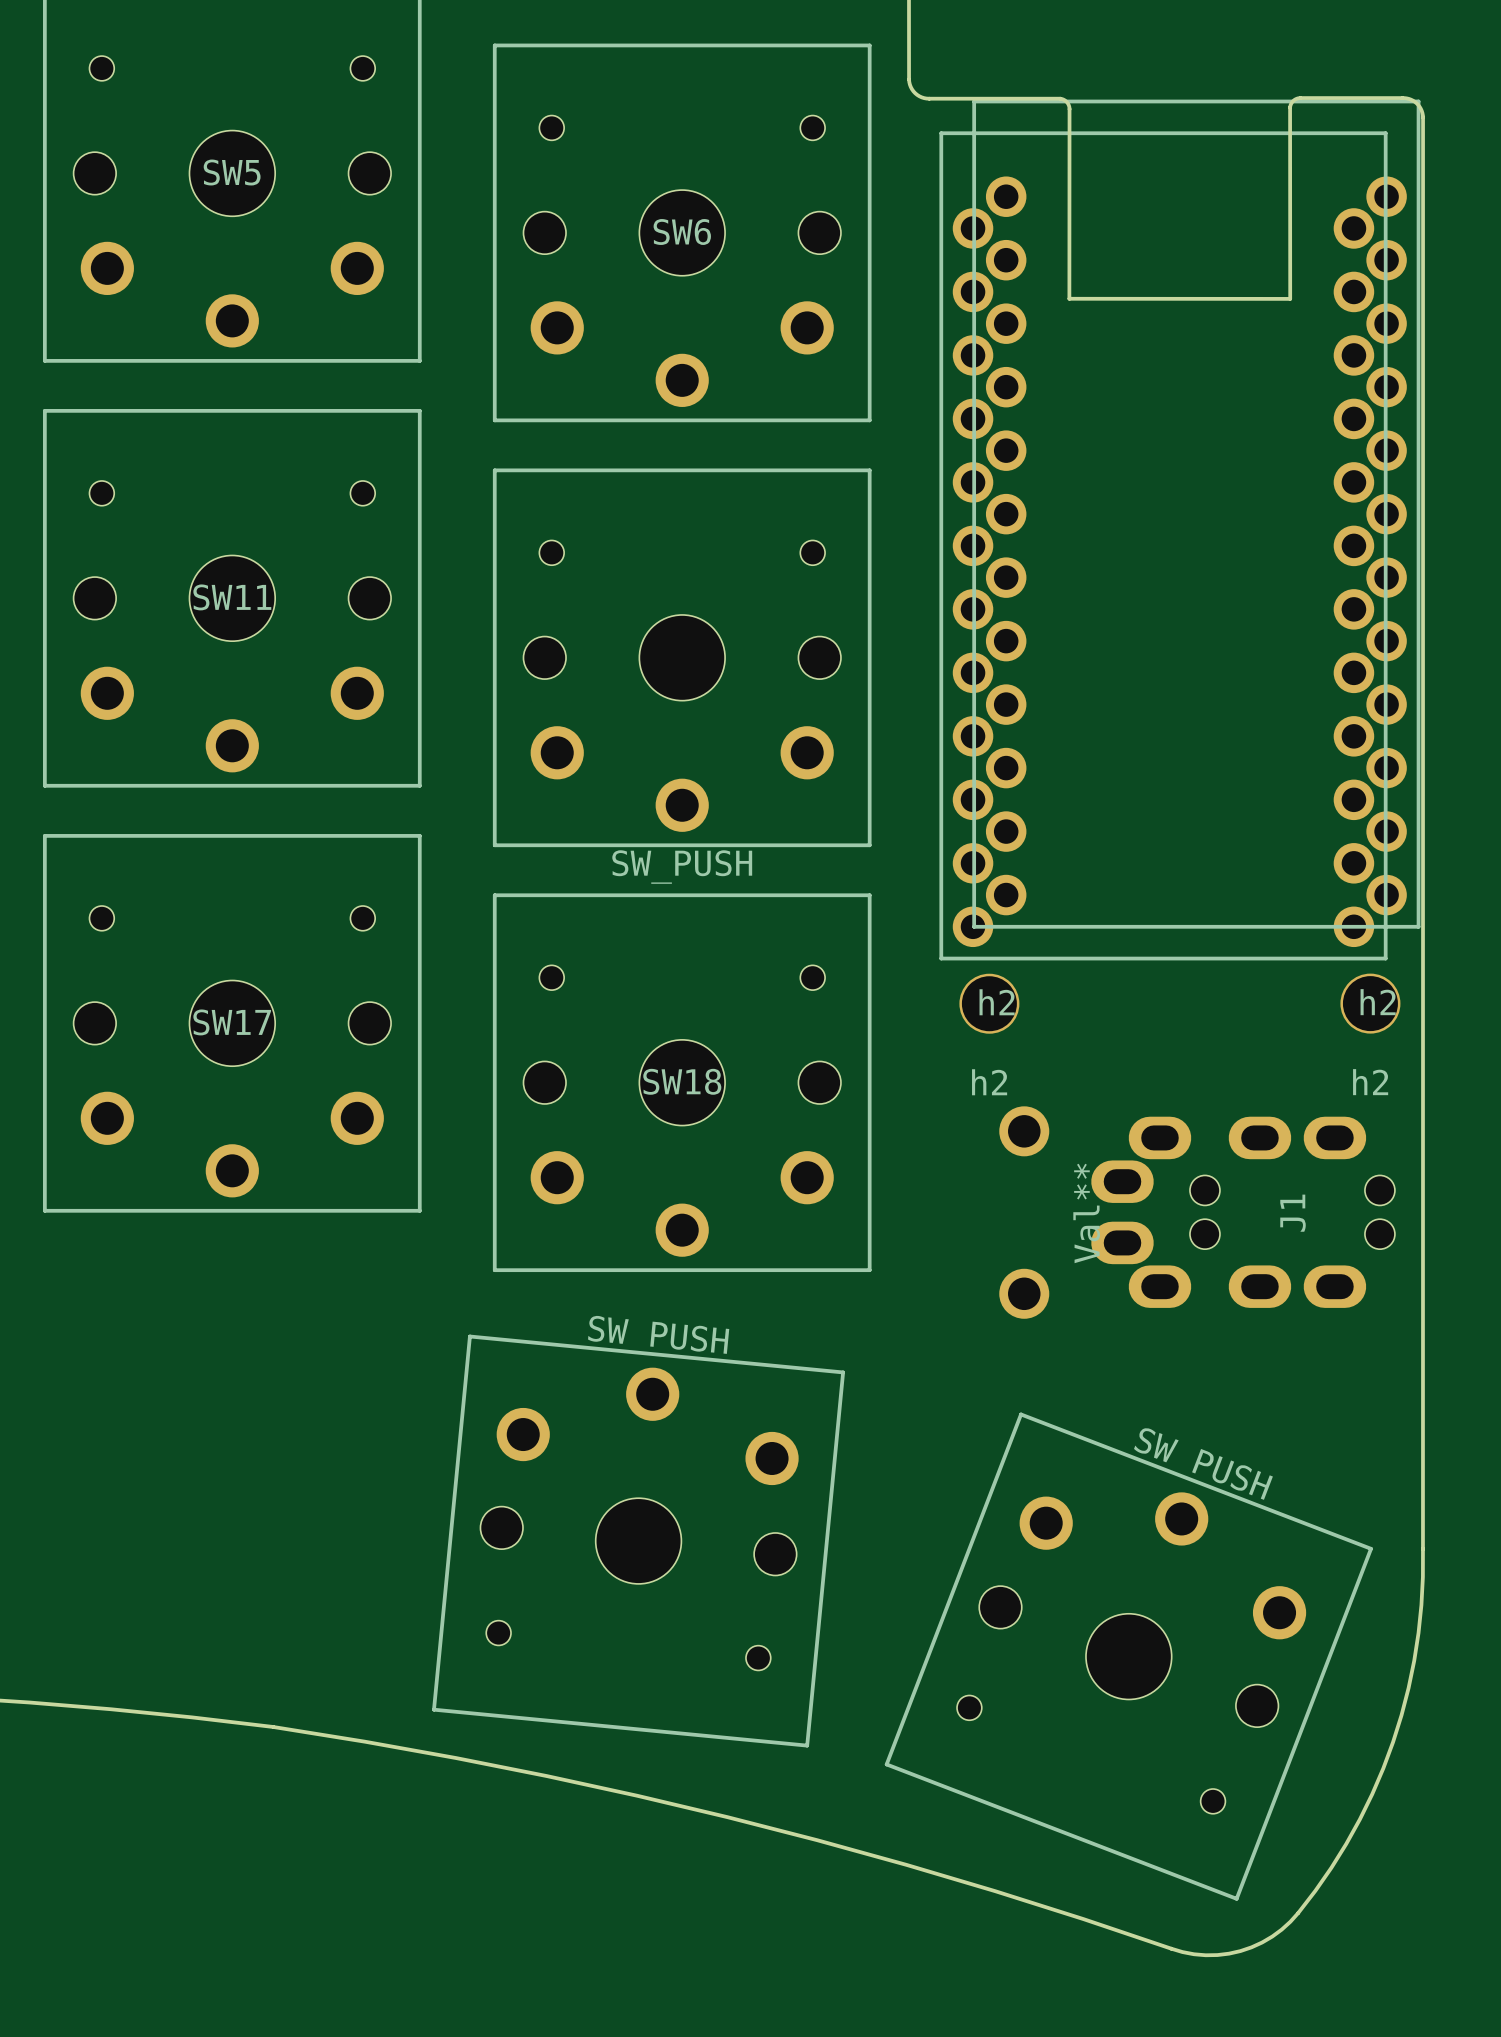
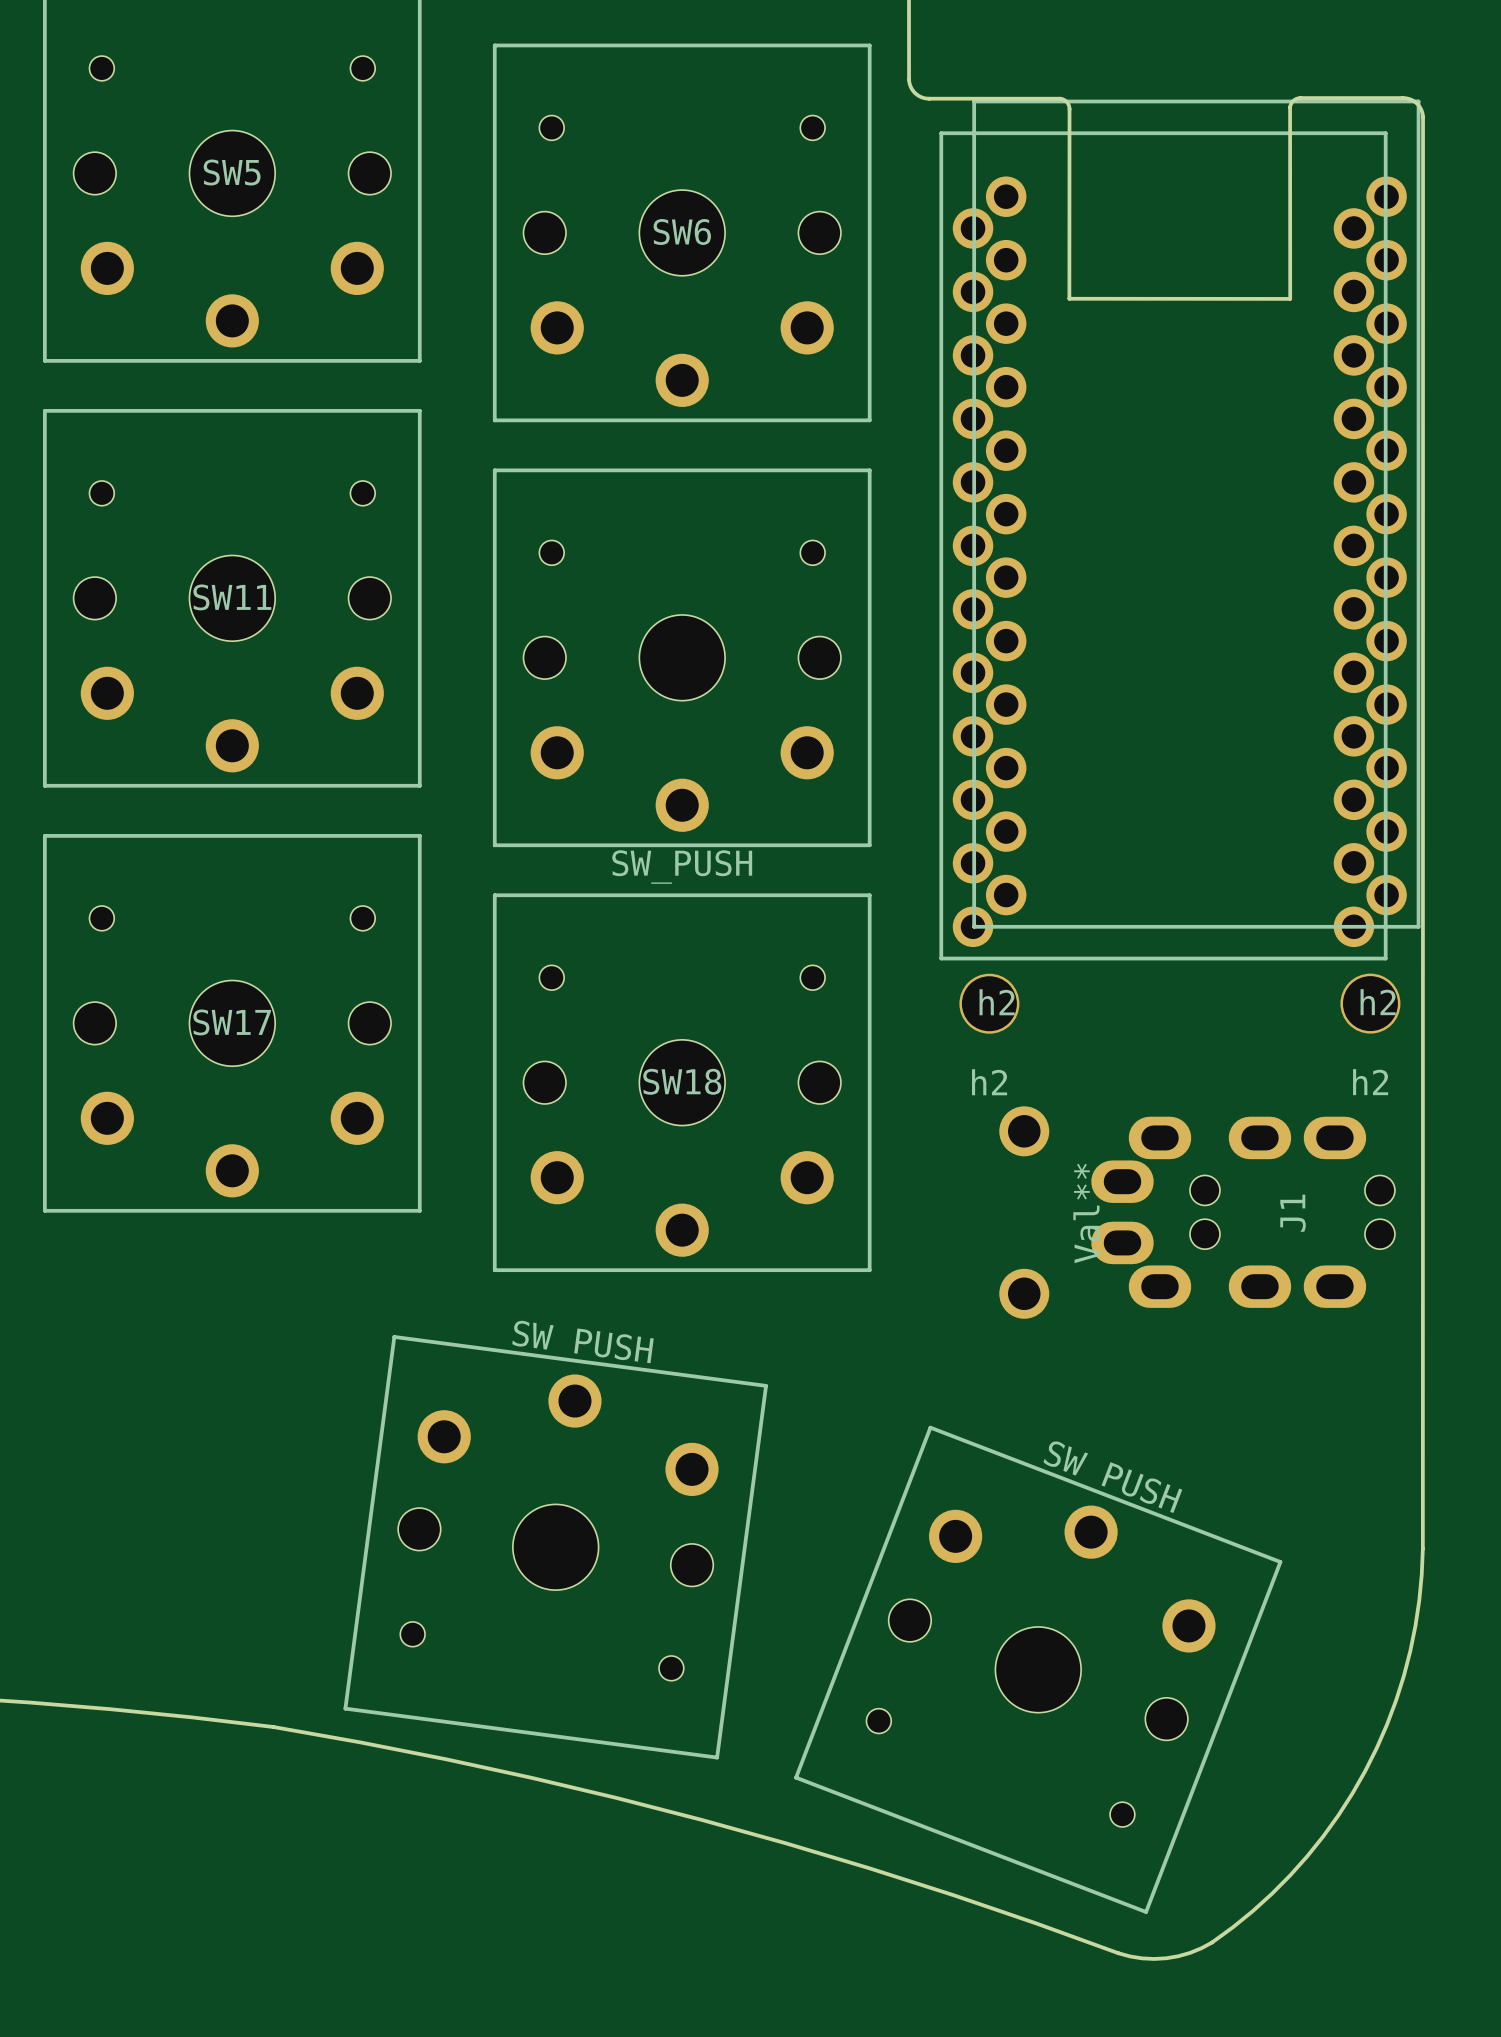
board edge: (1423, 117) (1421, 1605) (1408, 1688) (1383, 1768) (1346, 1843) (1315, 1890) (1290, 1921) (1262, 1942) (1229, 1953) (1194, 1954) (906, 1864) (727, 1817) (637, 1795) (455, 1758) (273, 1726) -> (1423, 117) (1421, 1574) (1410, 1650) (1396, 1700) (1365, 1771) (1338, 1815) (1290, 1875) (1252, 1911) (1212, 1942) (1178, 1956) (1142, 1958) (1118, 1953) (953, 1895) (869, 1868) (701, 1819) (531, 1777) (359, 1742) (273, 1726)
part: SW_PUSH (638, 1541) -> none
part: none -> SW_PUSH (555, 1547)
part position: (1128, 1656) -> (1038, 1669)

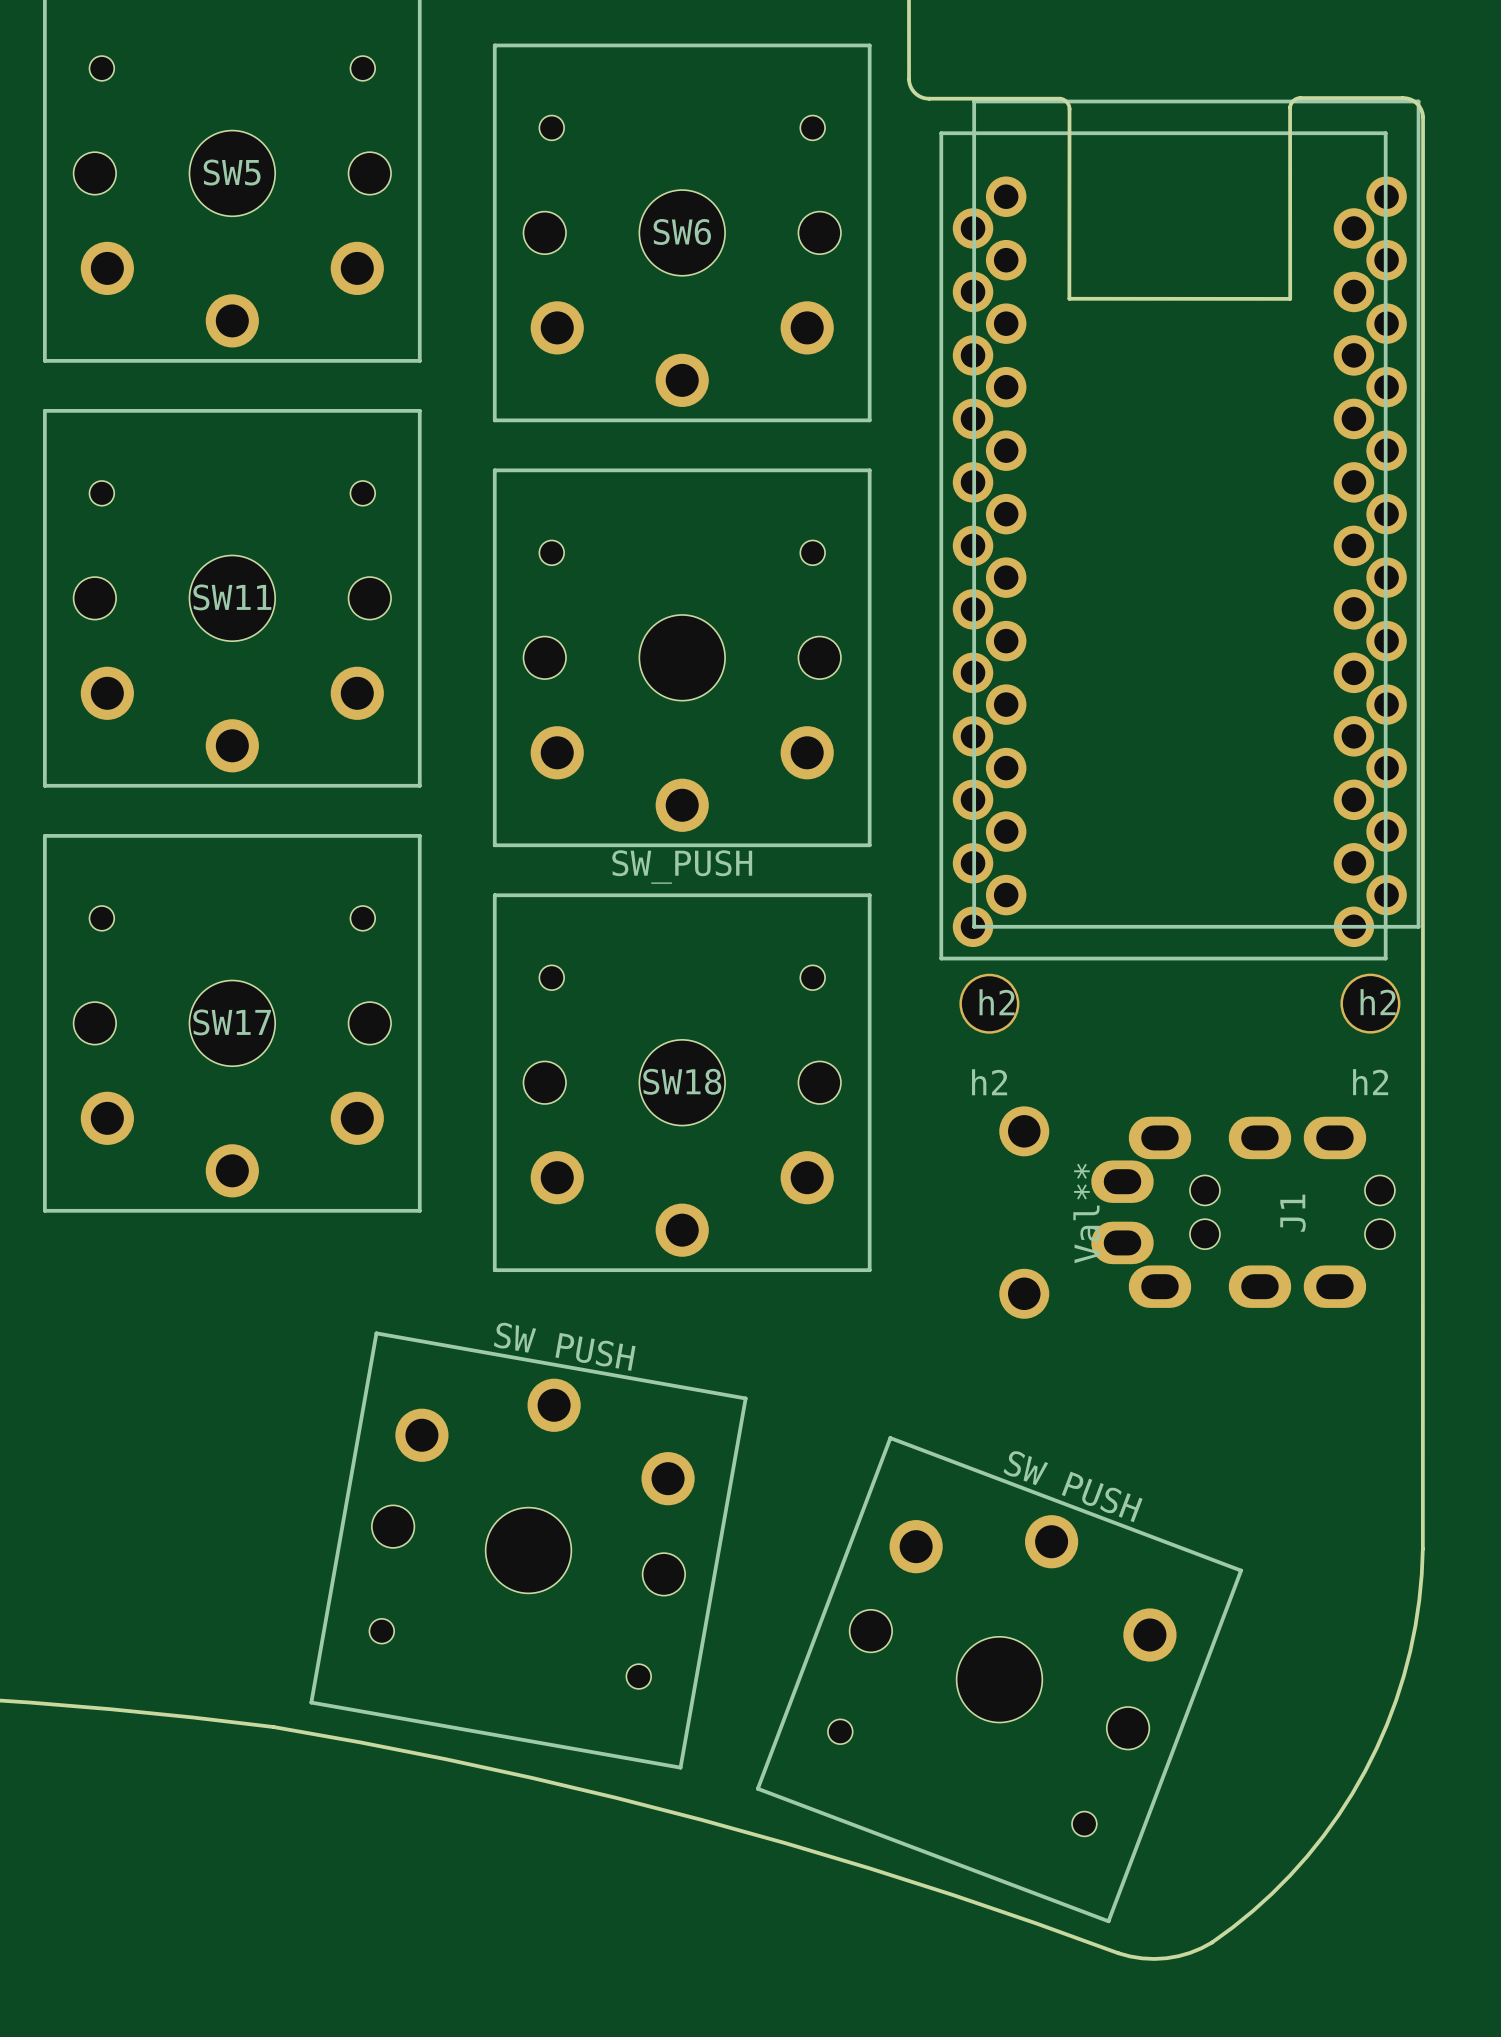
part: SW_PUSH (555, 1547) -> none
part: none -> SW_PUSH (528, 1550)
part: SW_PUSH (1038, 1669) -> none
part: none -> SW_PUSH (999, 1679)

